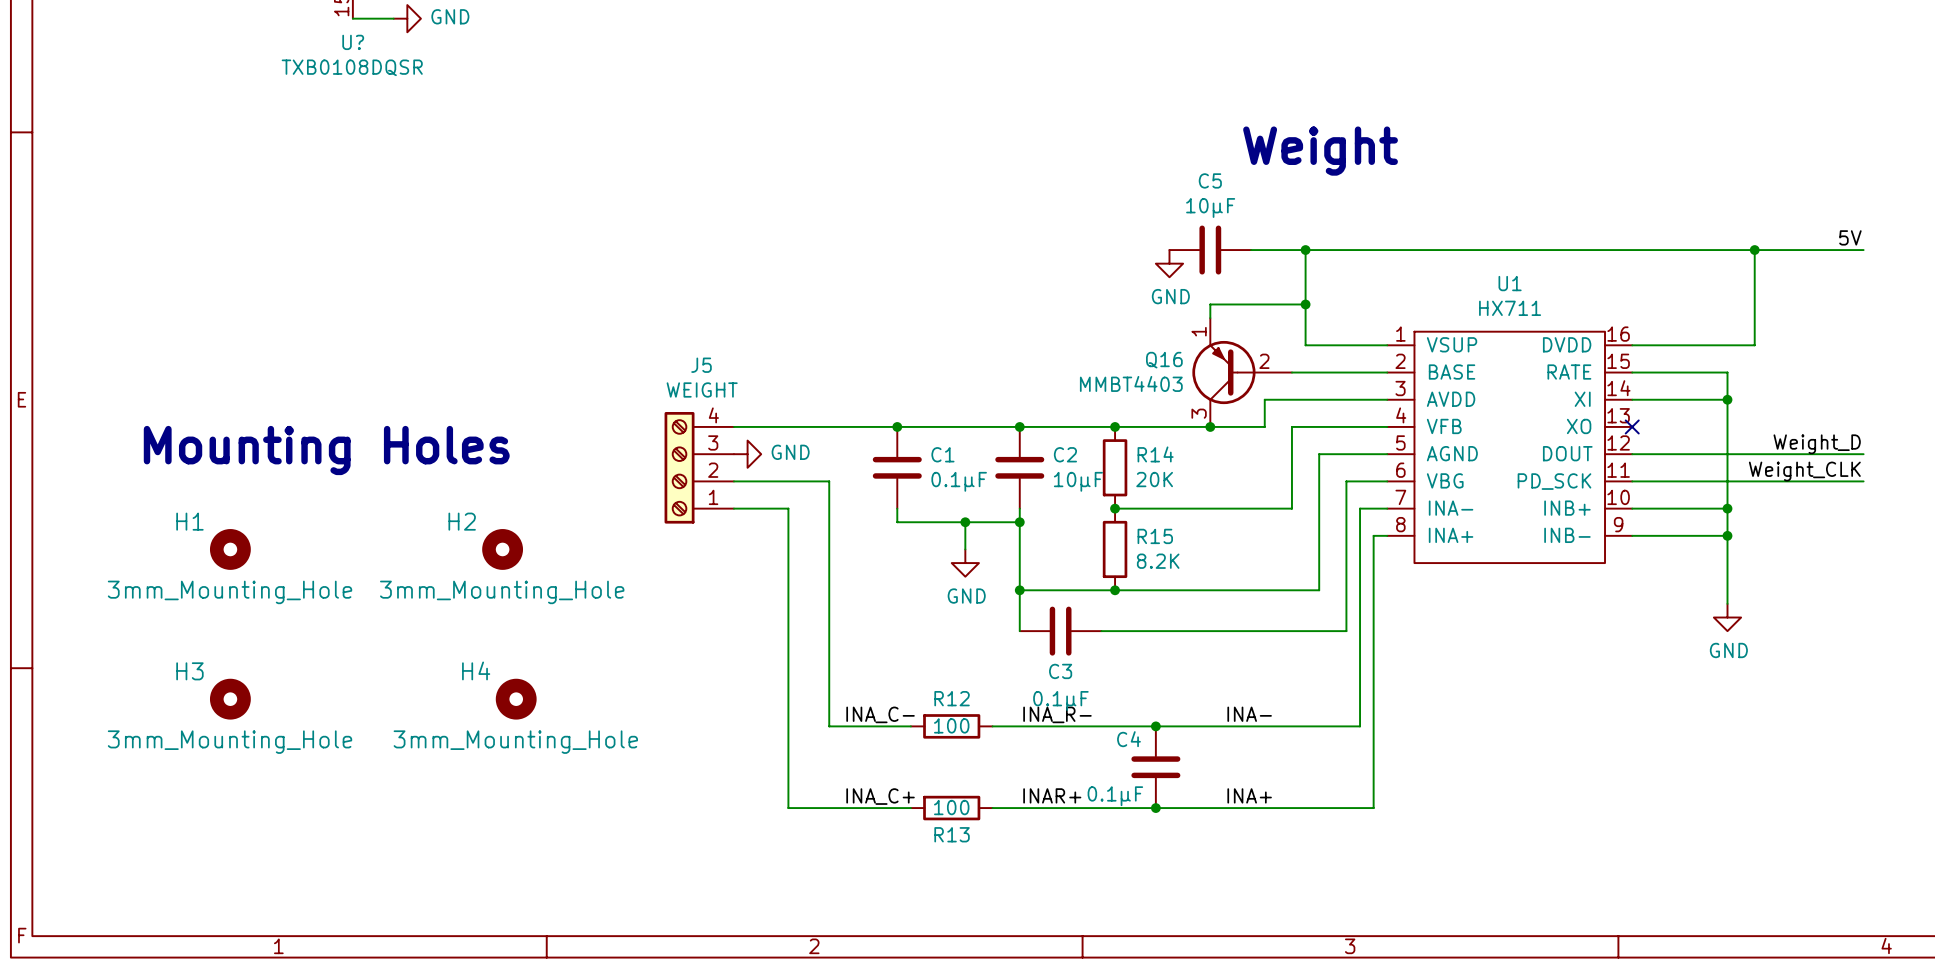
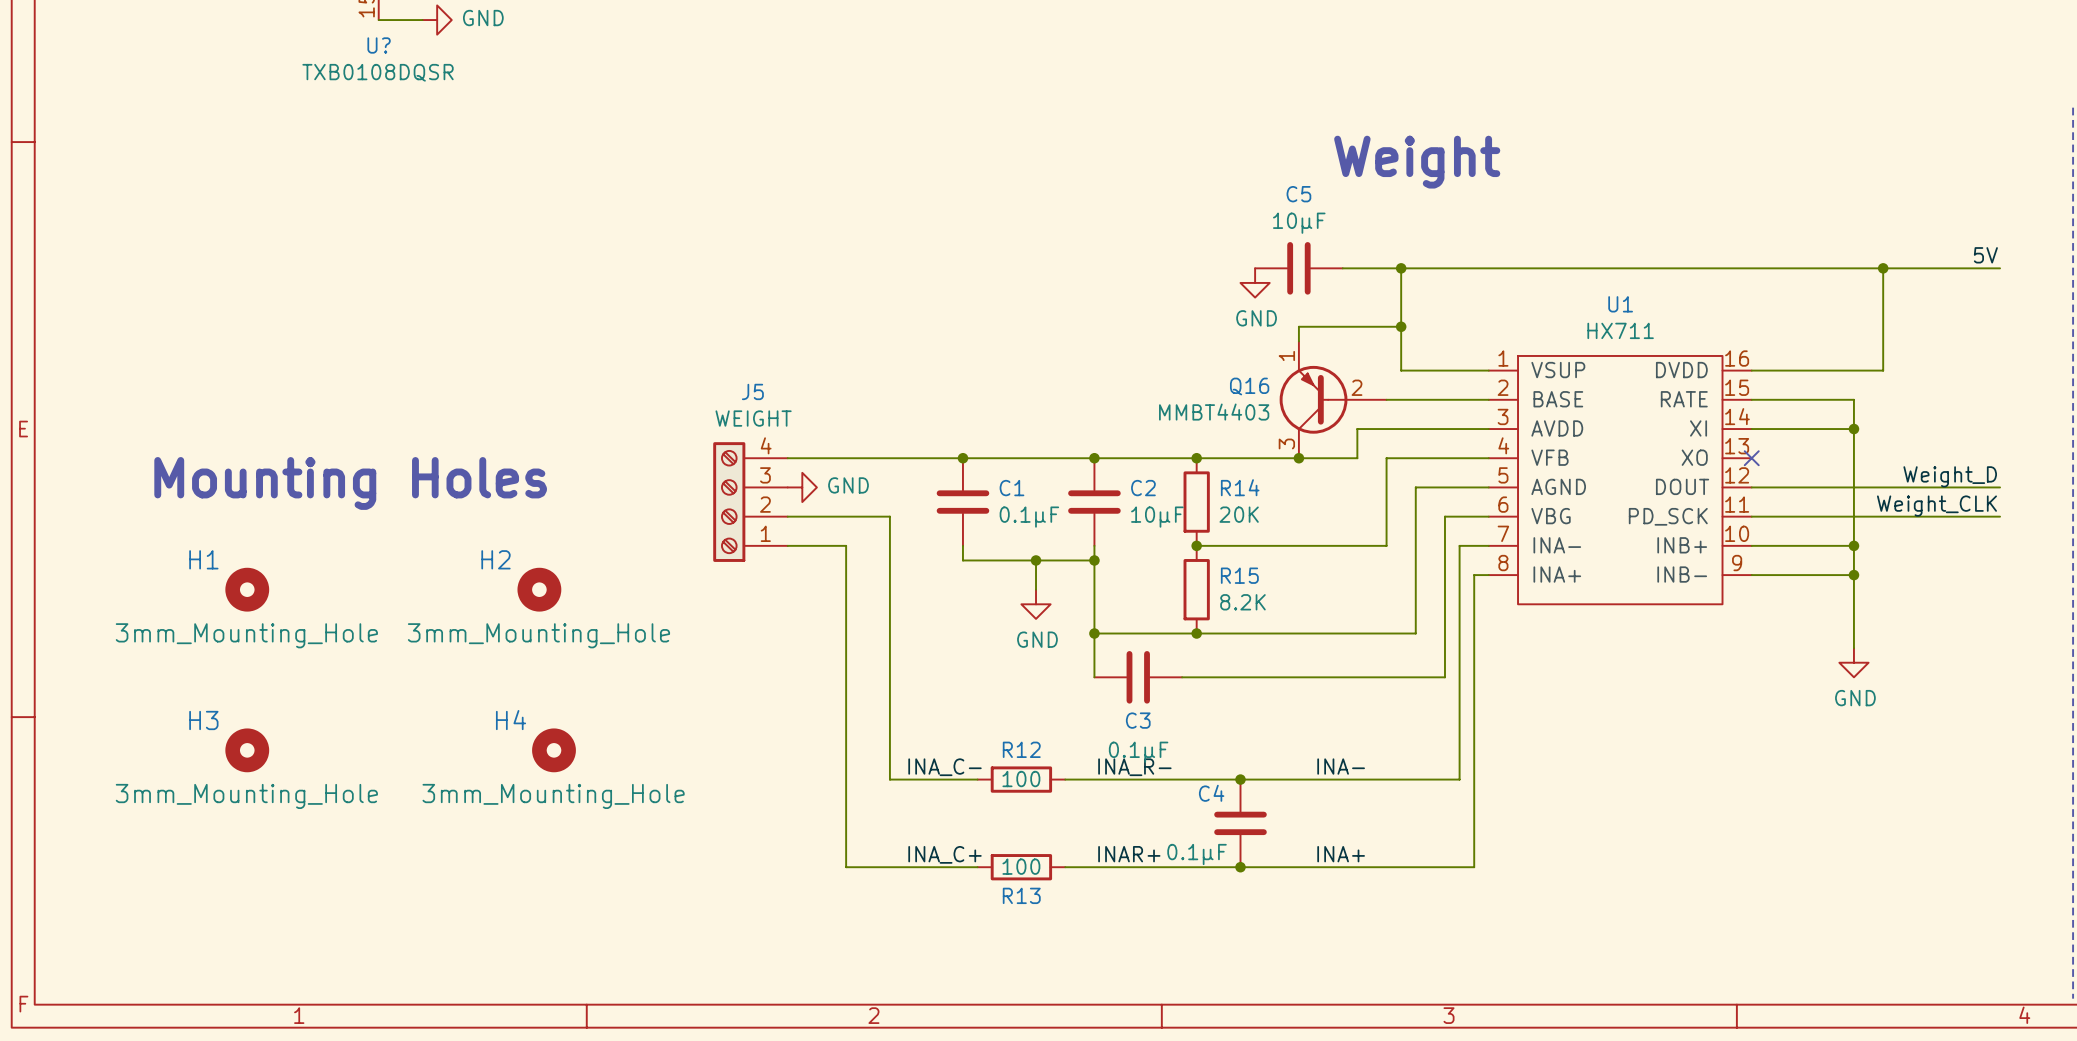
line: none -> (2073, 107) (2073, 998)

